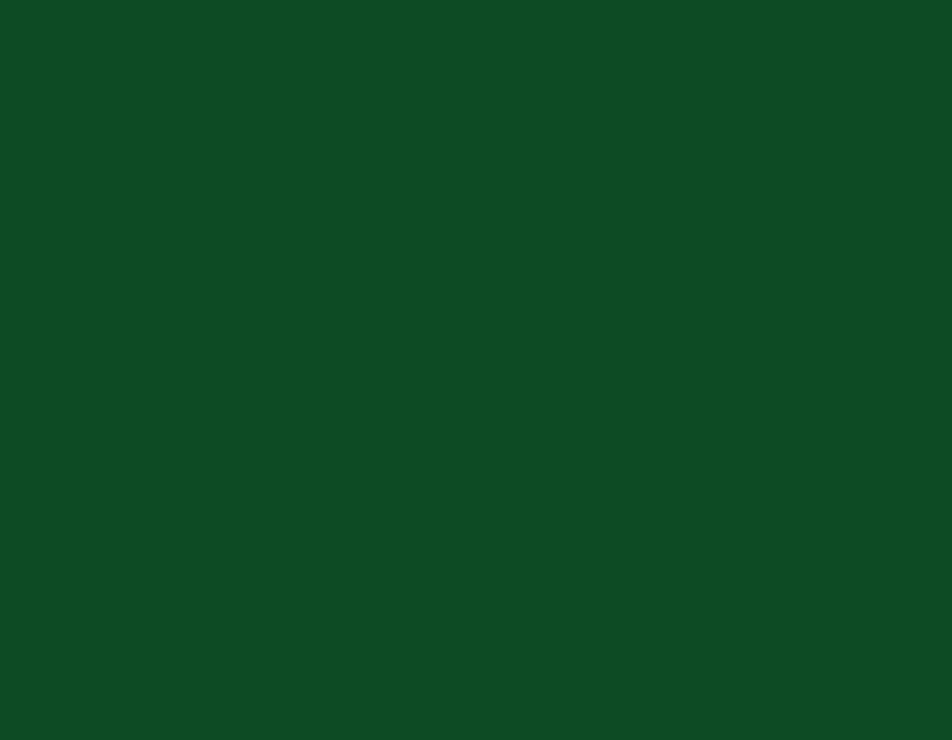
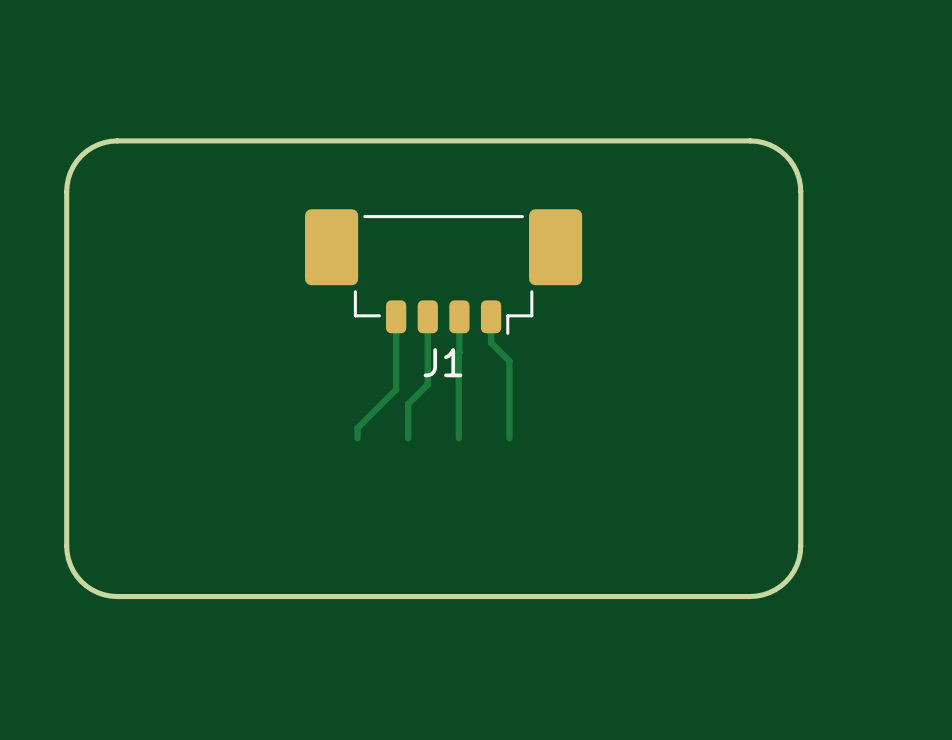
board edge: none -> (117, 140) (750, 140) (763, 142) (775, 147) (785, 155) (793, 166) (799, 178) (800, 191) (800, 545) (799, 559) (793, 571) (785, 581) (775, 589) (763, 594) (750, 596) (117, 596) (104, 594) (92, 589) (81, 581) (73, 571) (68, 559) (66, 545) (66, 191) (70, 172) (81, 155) (97, 144) (117, 140)
J1: none -> (443, 272)
track: none -> (396, 316) (396, 389) (357, 428) (357, 438)
track: none -> (427, 316) (427, 384) (408, 404) (408, 438)
track: none -> (459, 316) (458, 438)
track: none -> (491, 316) (491, 342) (509, 361) (509, 438)

